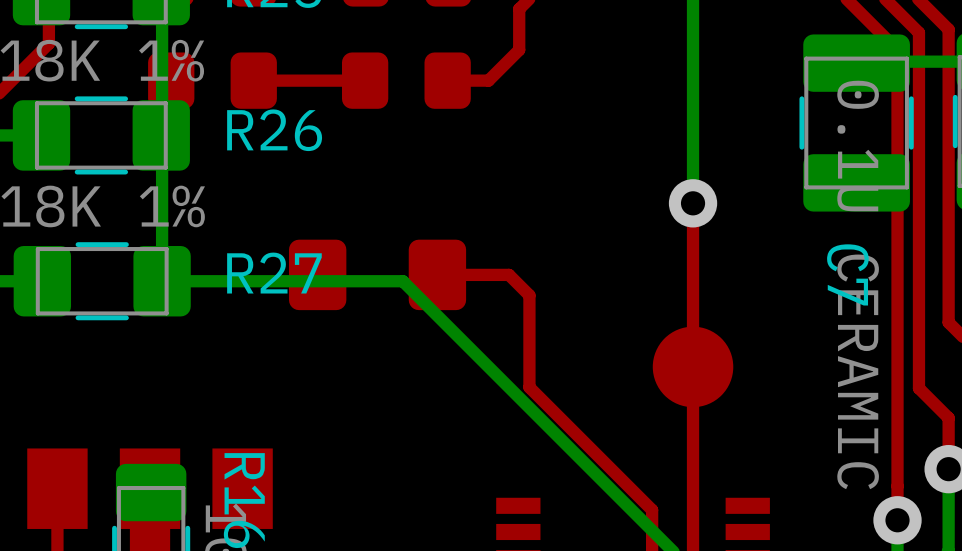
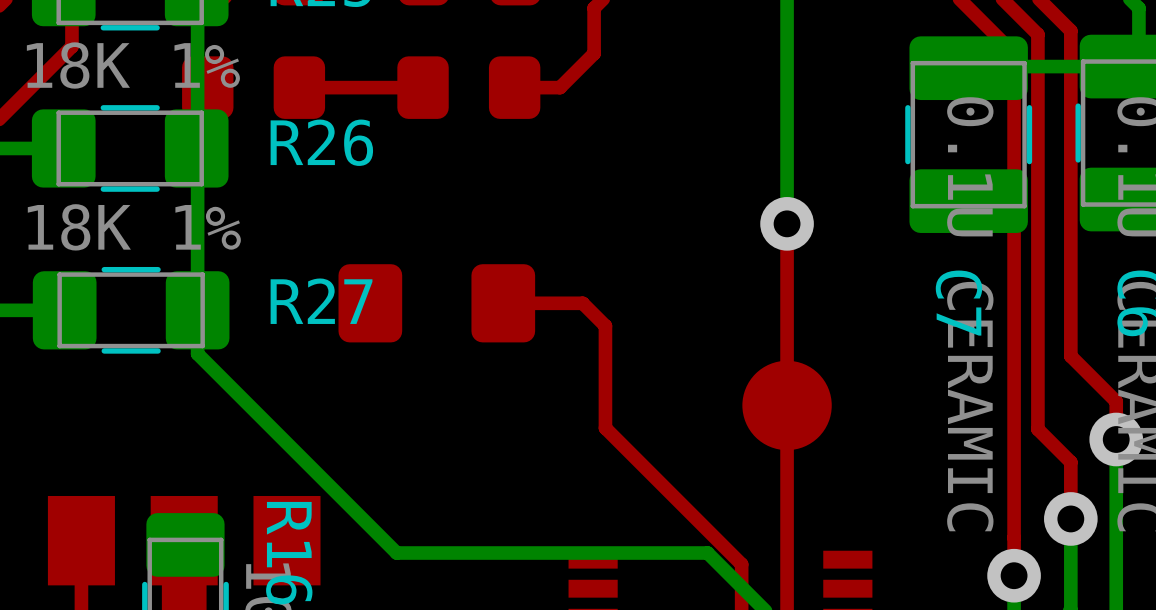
bottom track: (162, 281) (402, 281) (621, 499) -> (197, 310) (197, 353) (396, 553) (707, 553)

